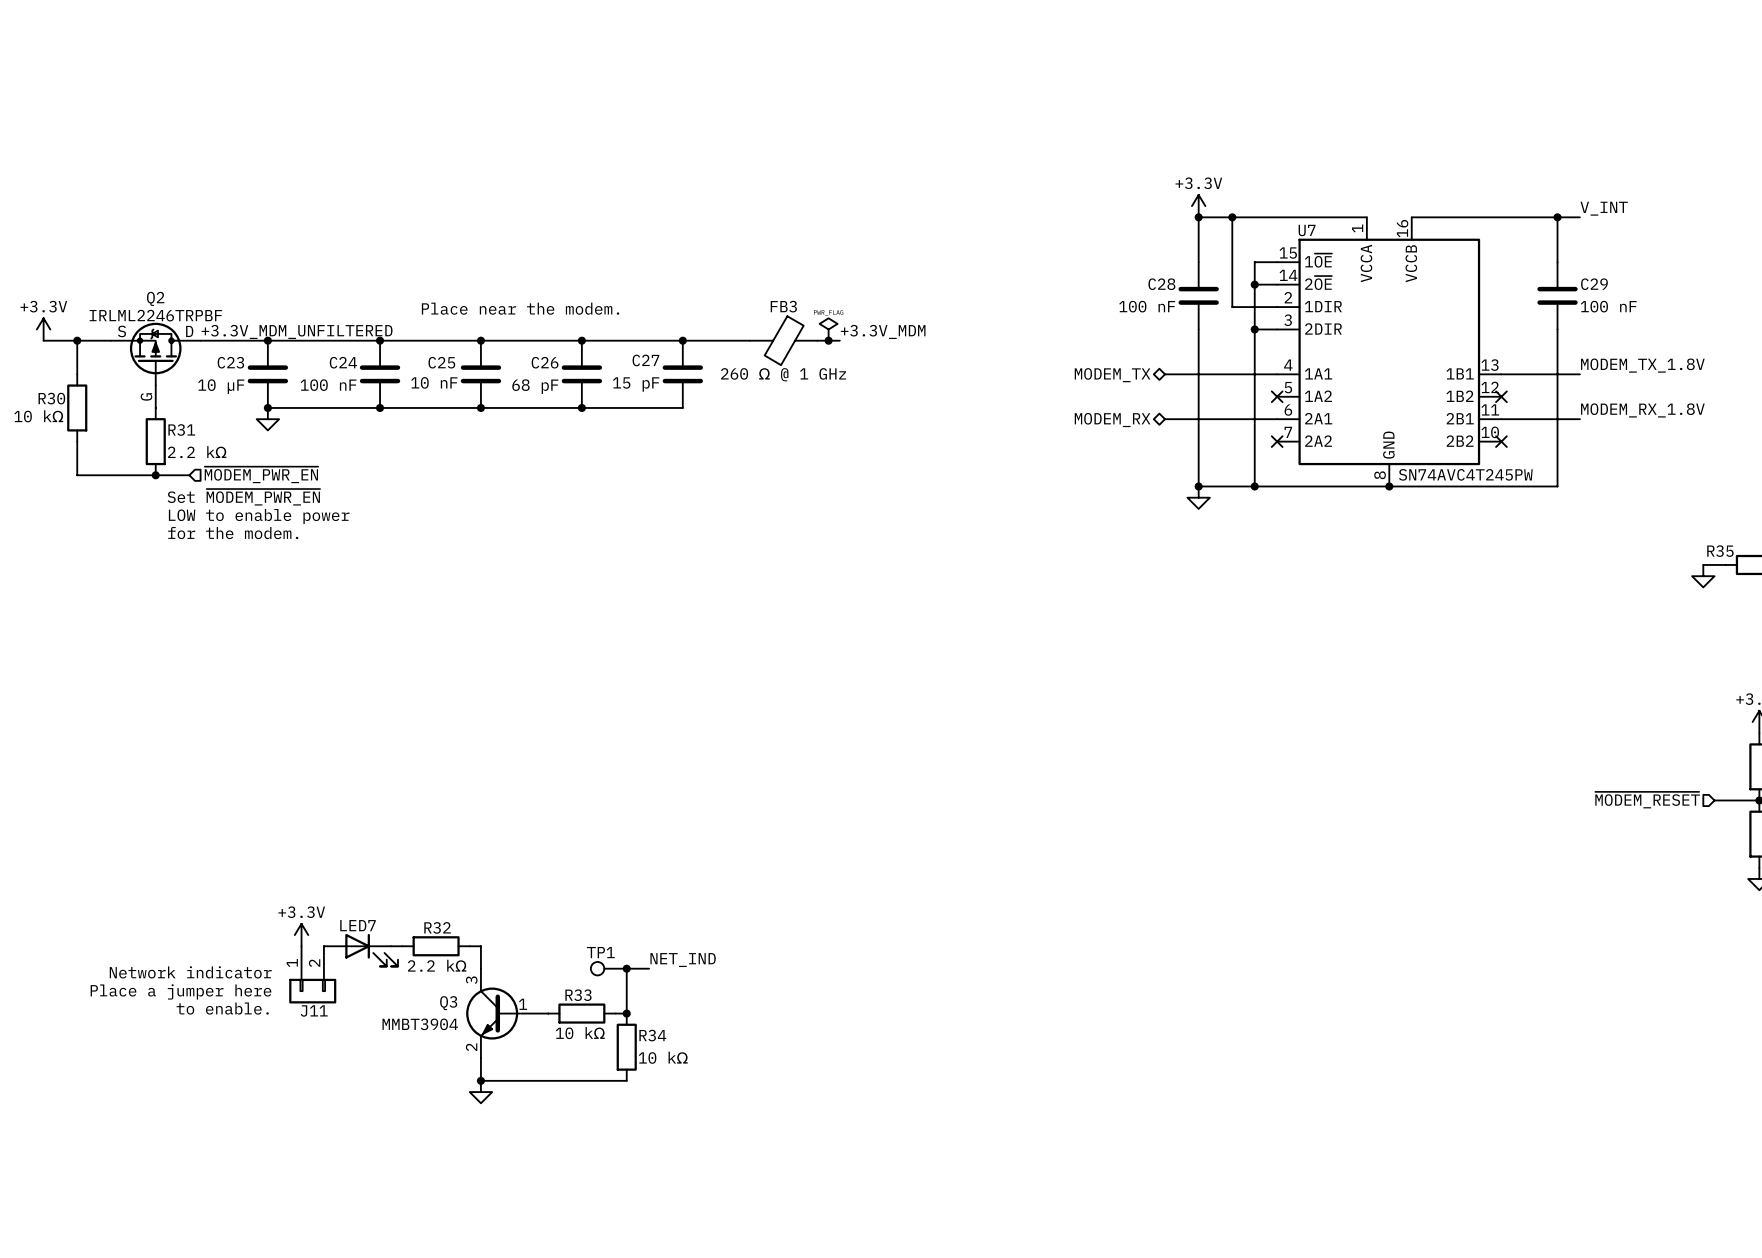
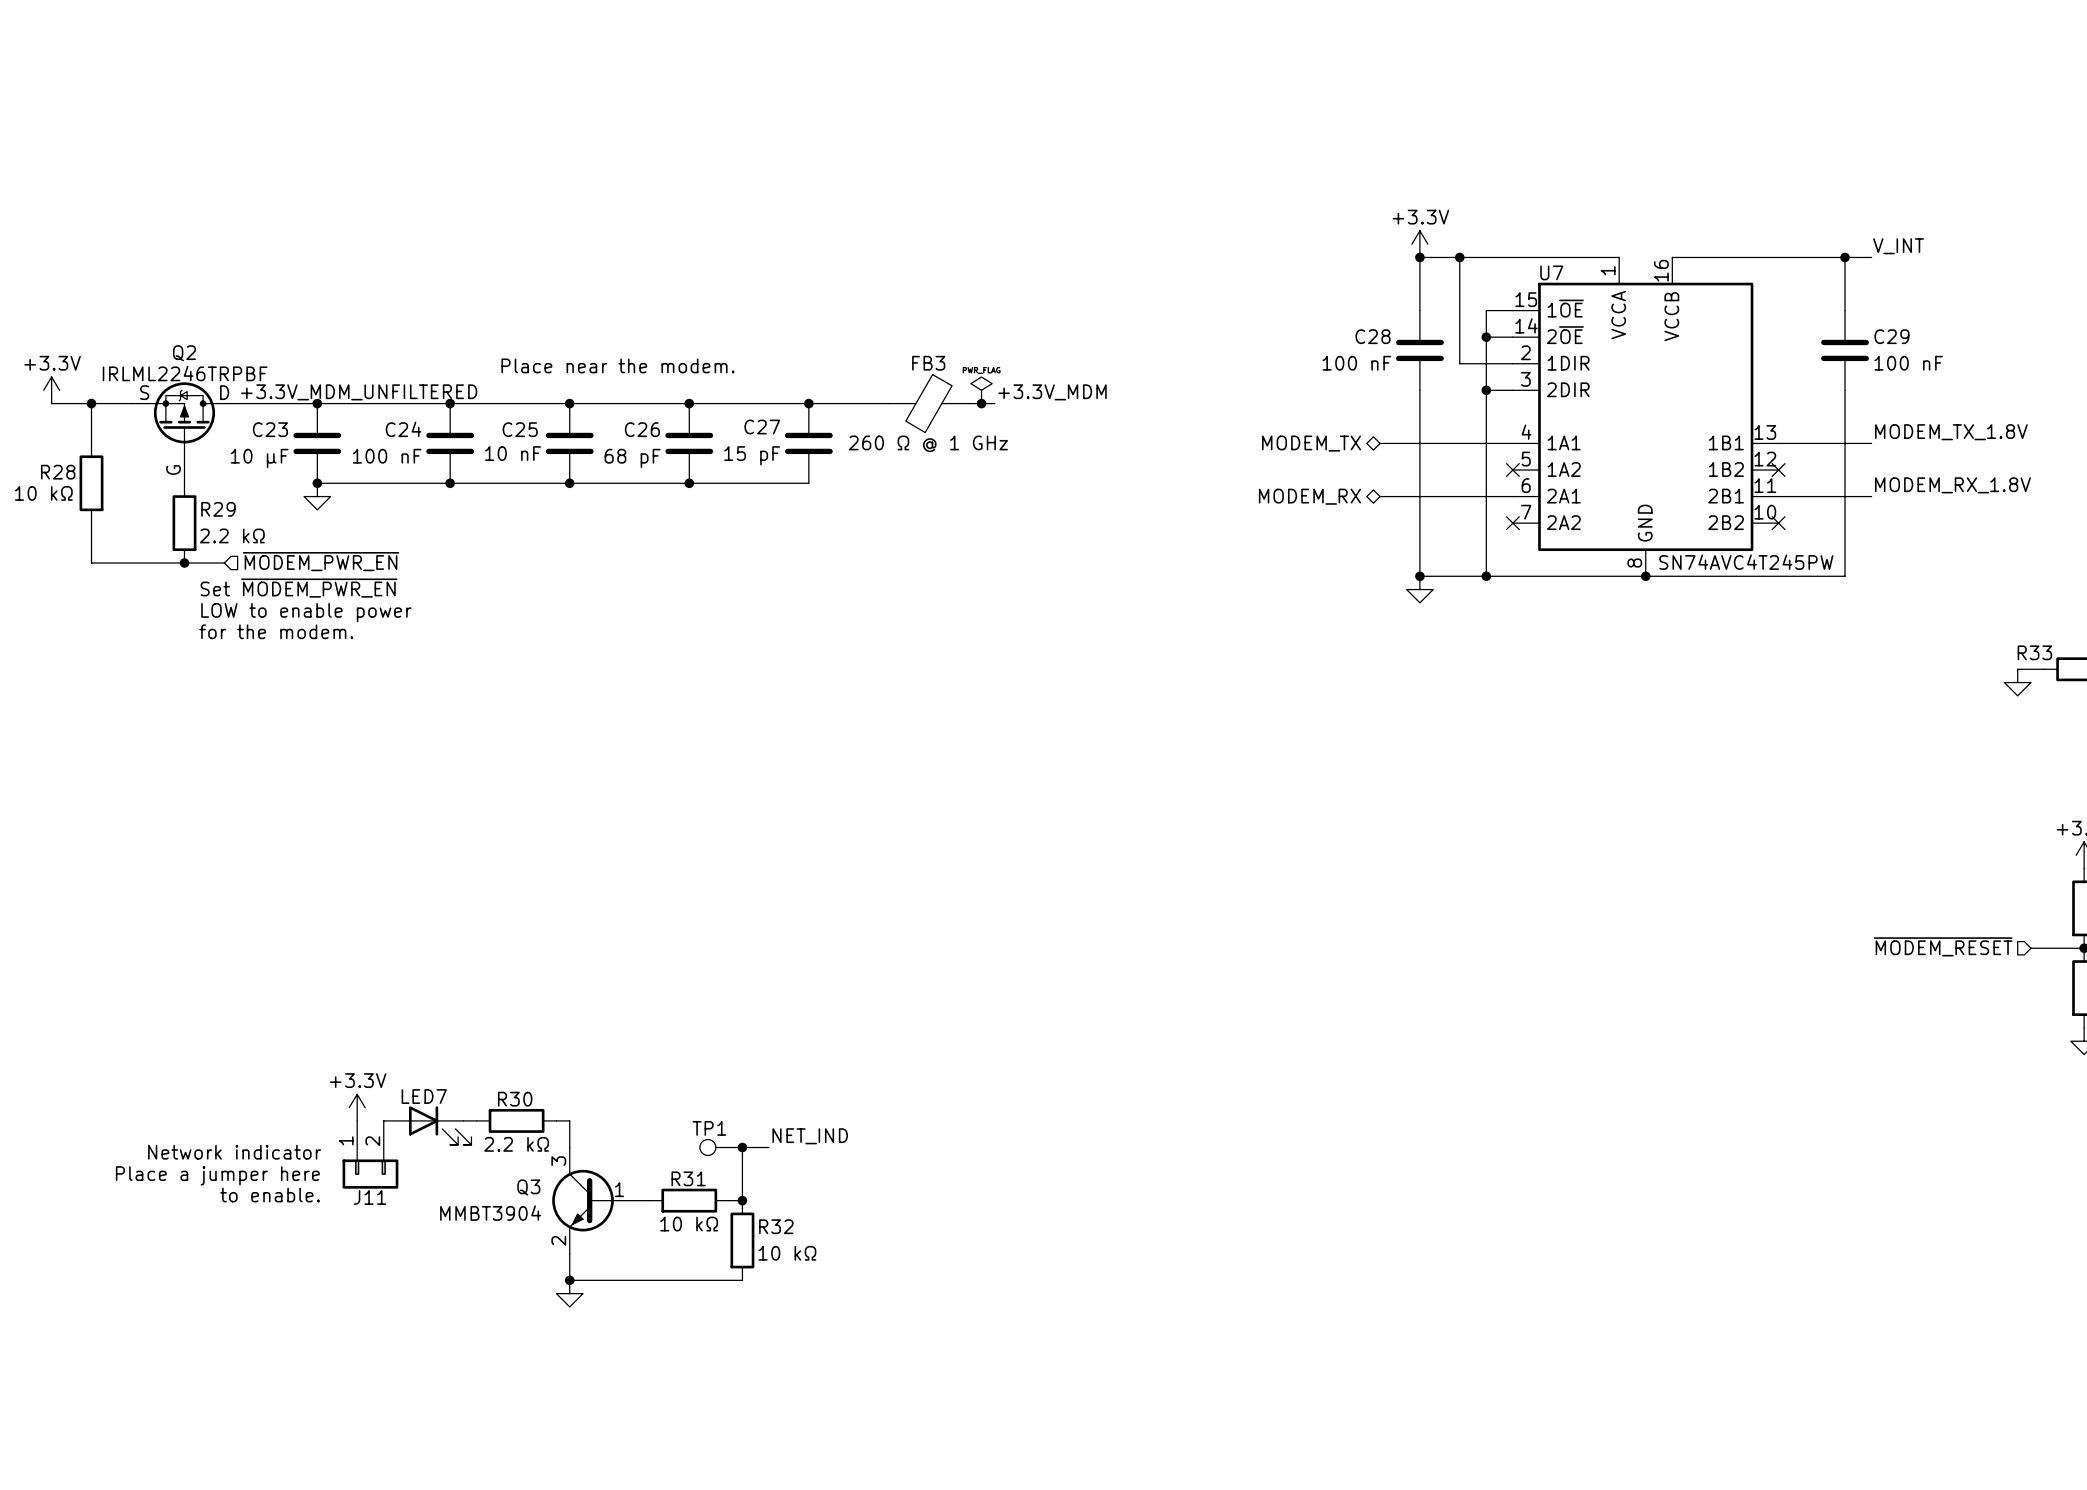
R30 name: R30 (51, 398) -> R28 (58, 472)
R31 name: R31 (181, 429) -> R29 (218, 509)
R35 name: R35 (1720, 551) -> R33 (2034, 652)
R32 name: R32 (437, 927) -> R30 (515, 1099)
R33 name: R33 (578, 995) -> R31 (688, 1178)
R34 name: R34 (652, 1035) -> R32 (776, 1226)

